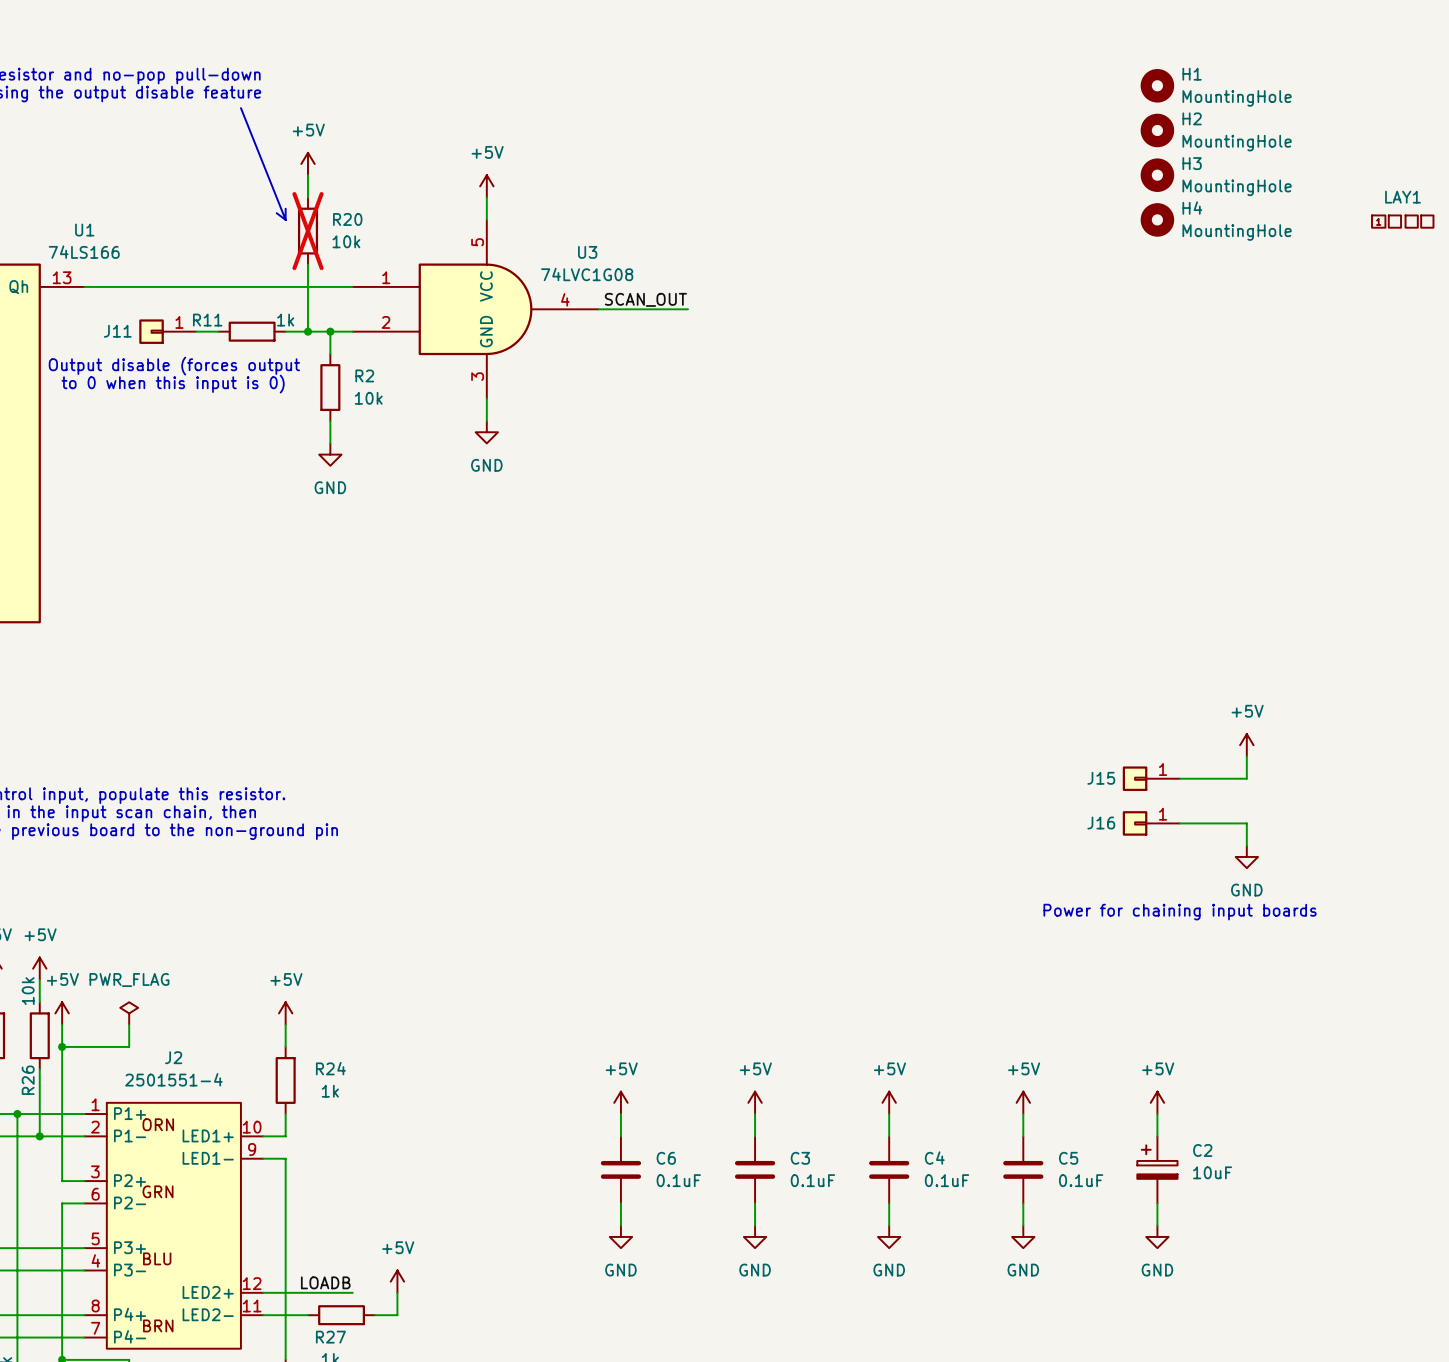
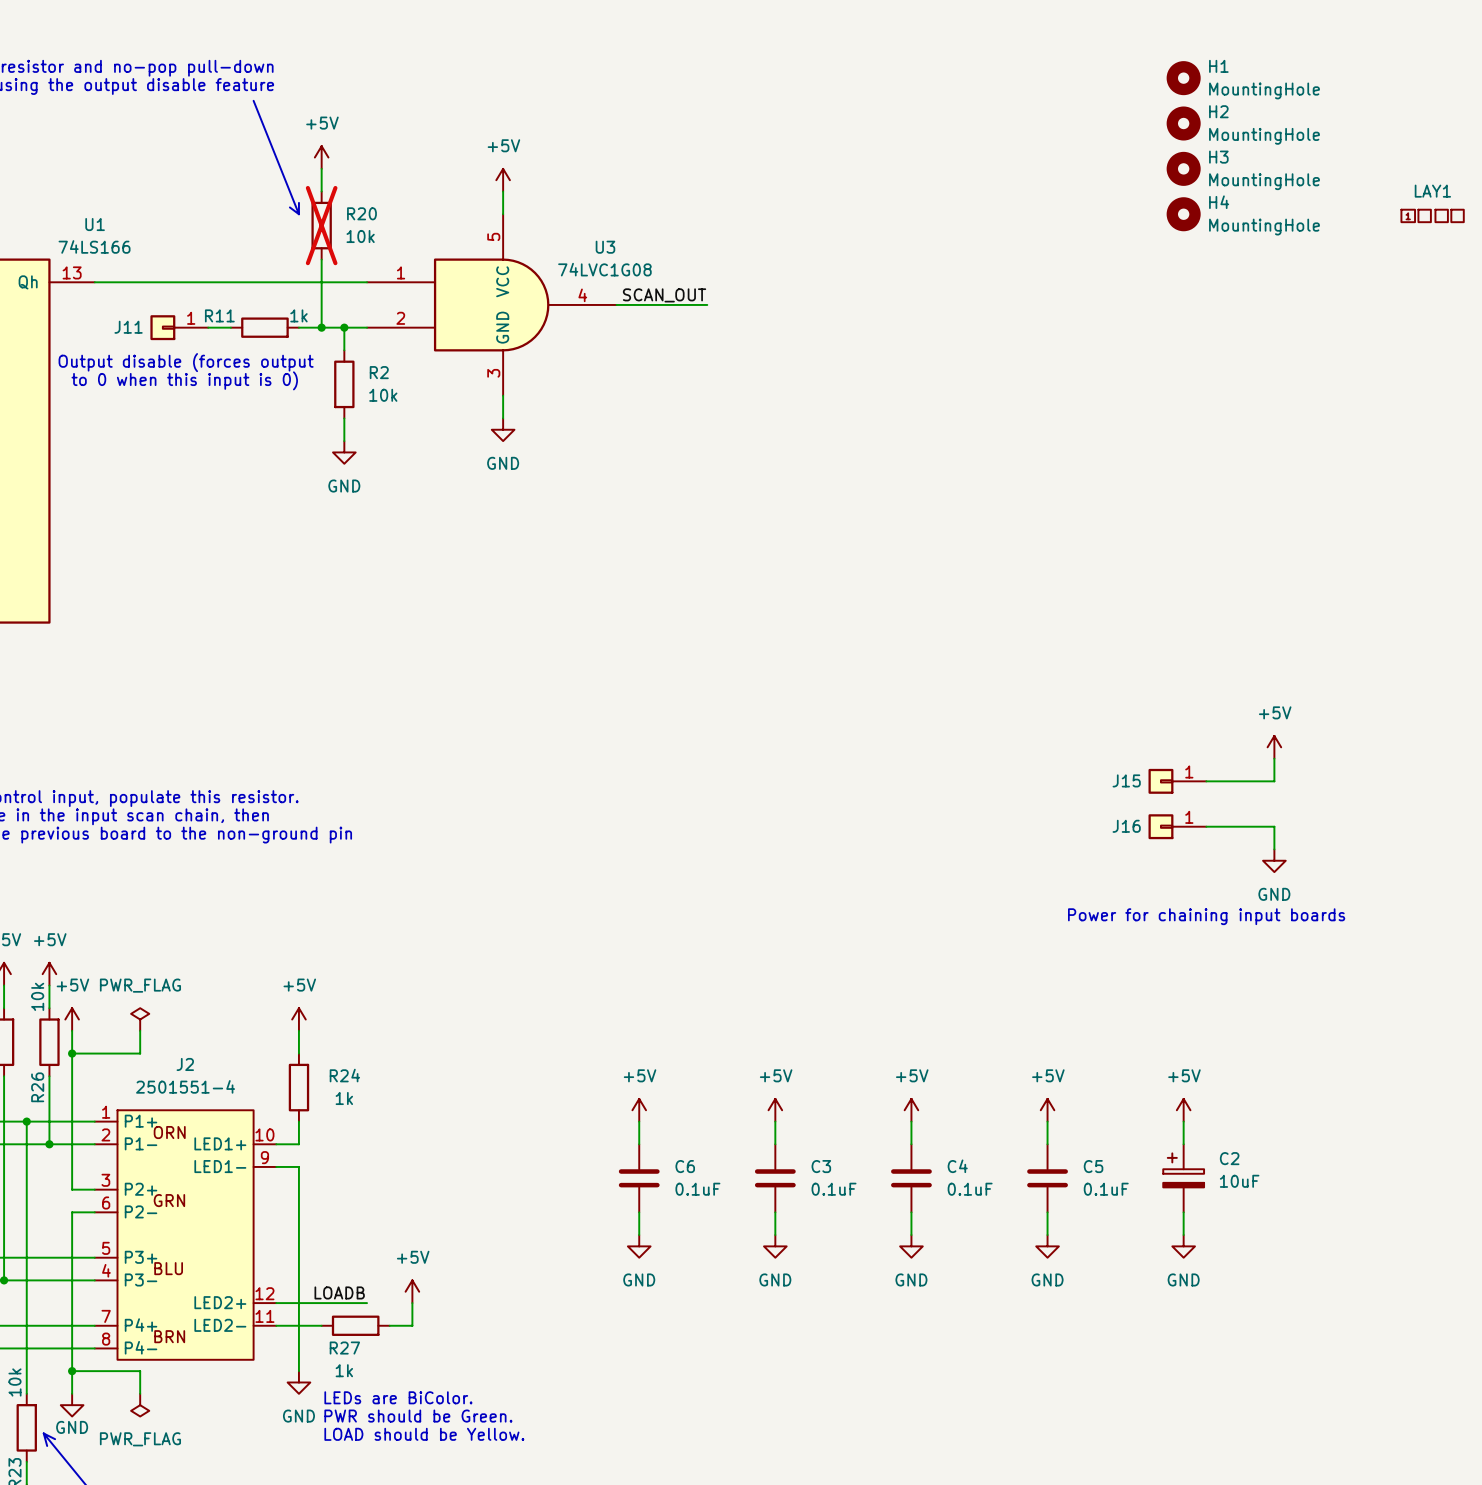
J2 pin number: 8 (95, 1305) -> 7 (106, 1316)
J2 pin number: 7 (95, 1328) -> 8 (106, 1339)

